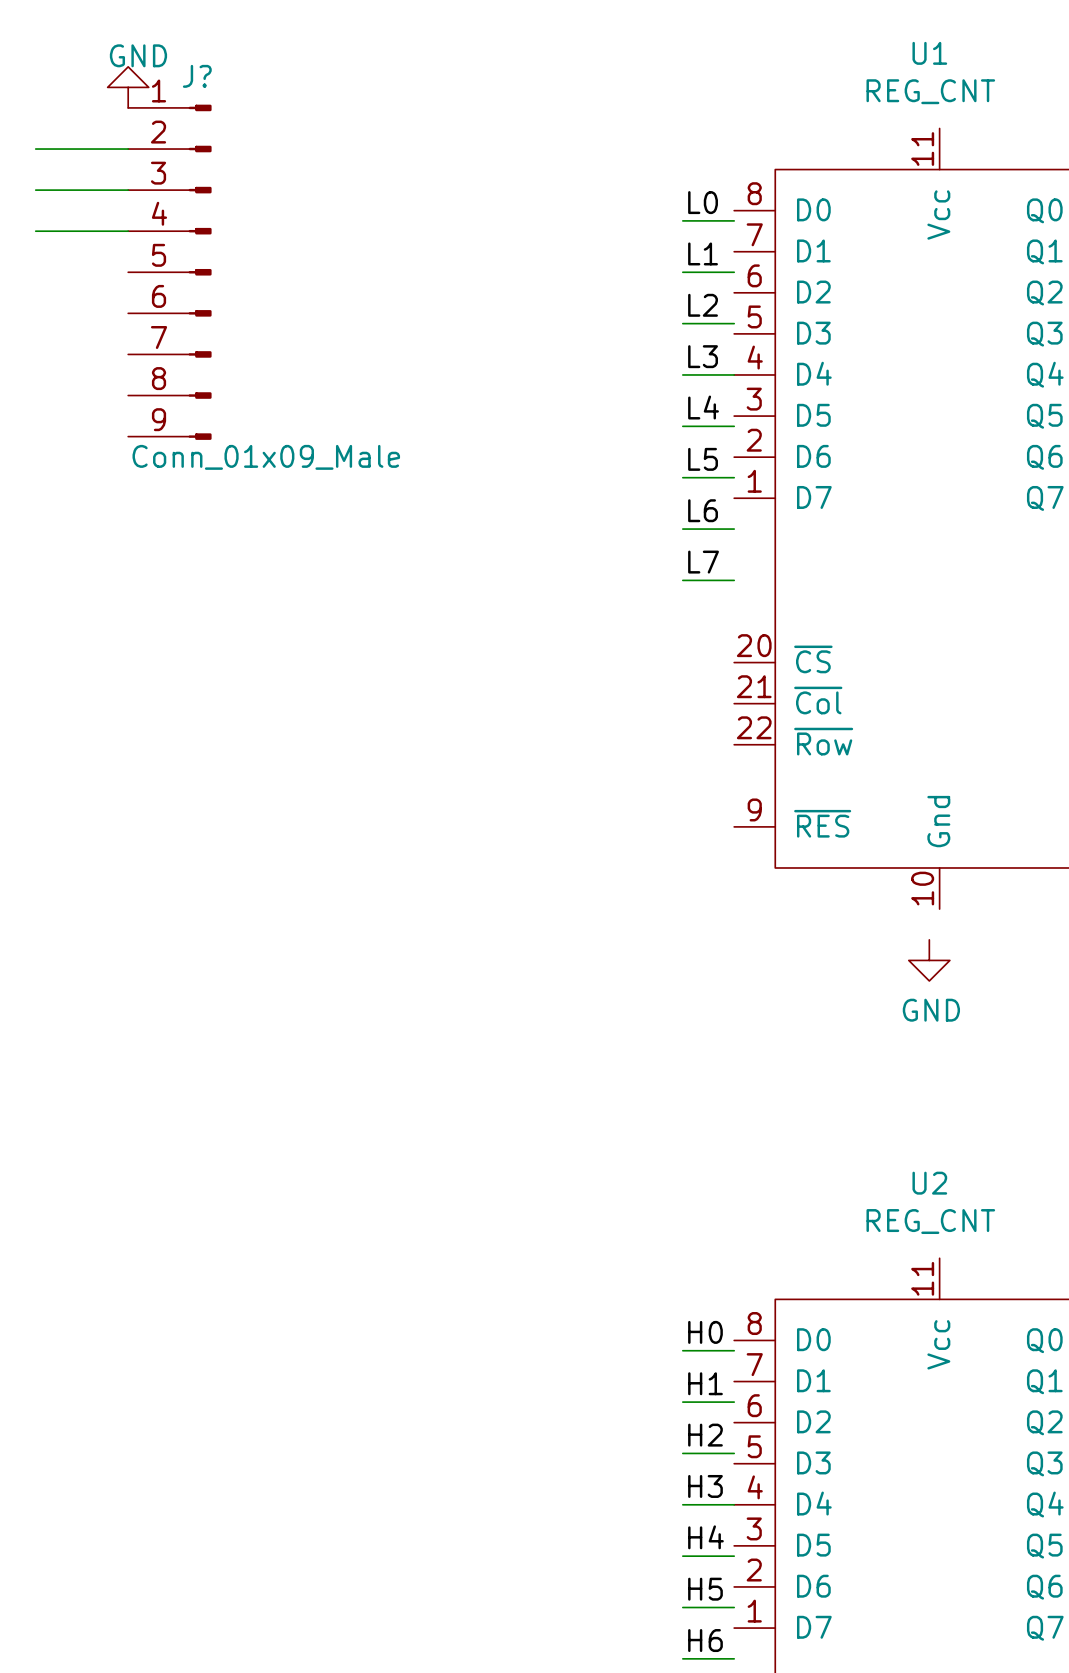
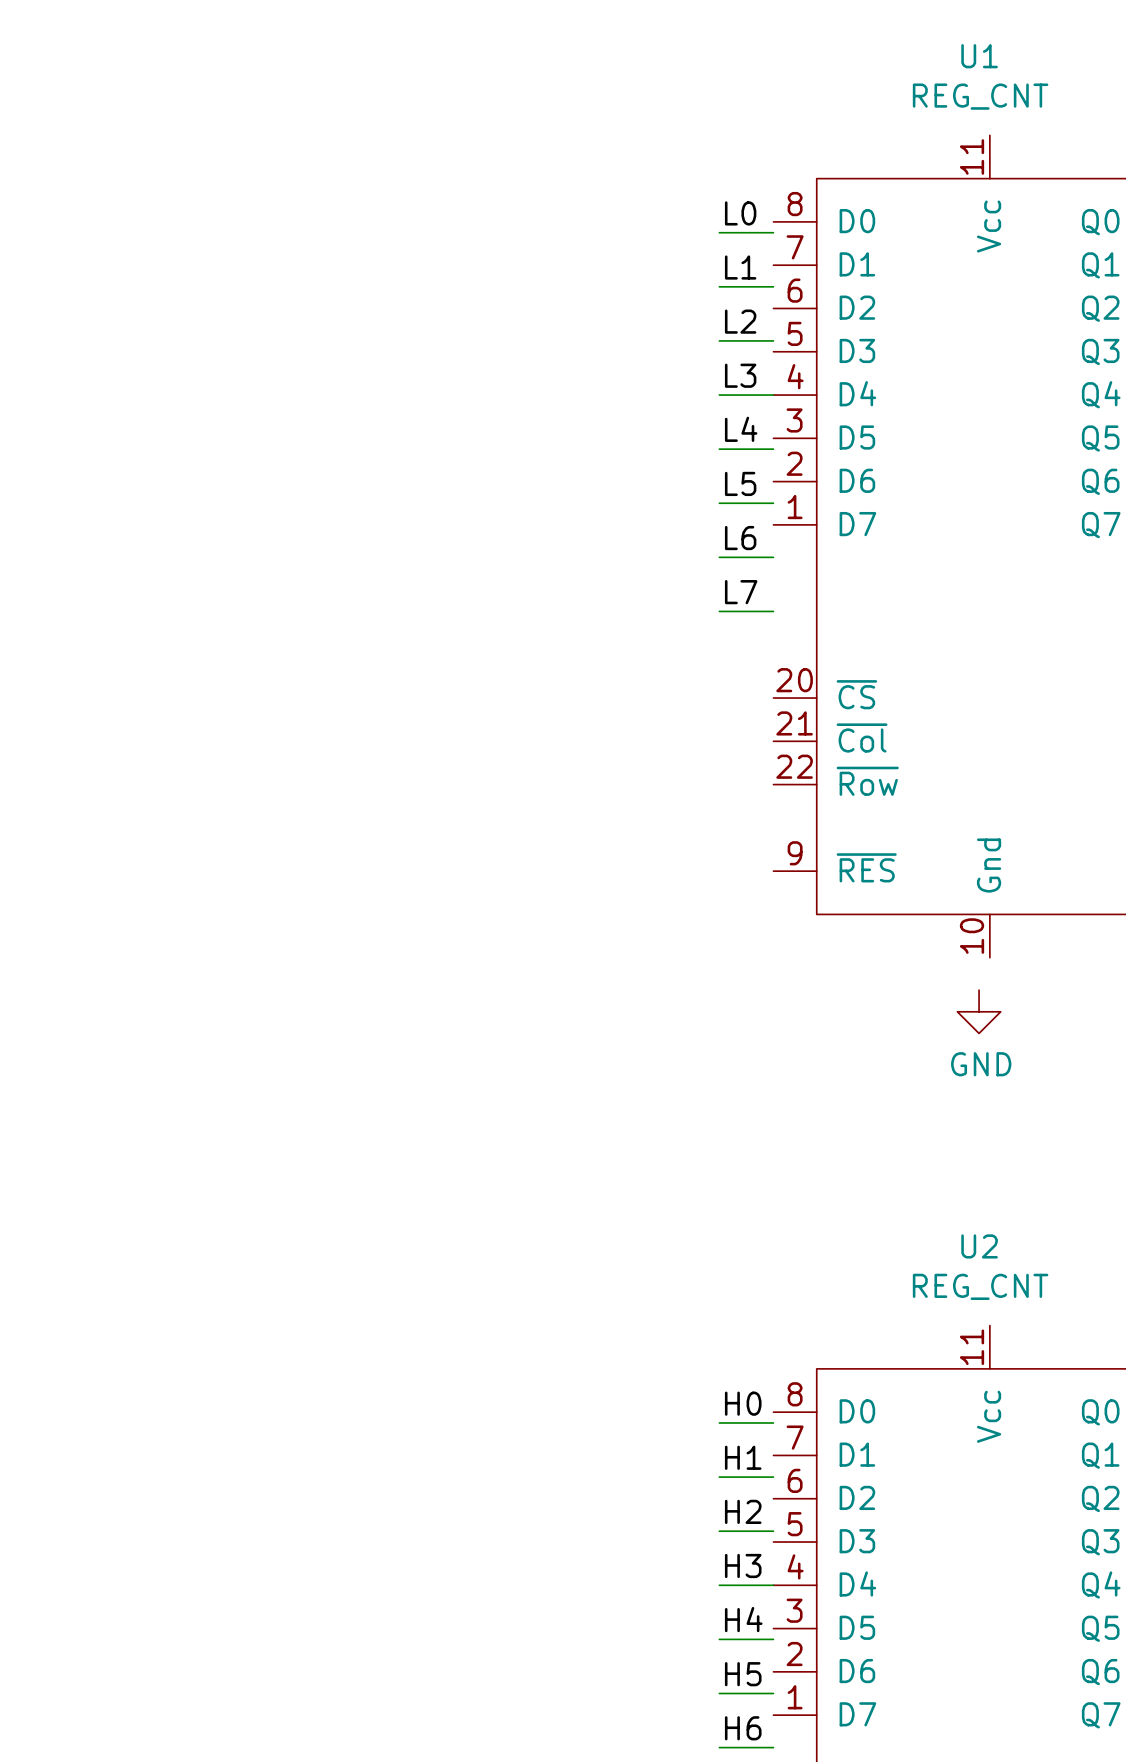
power symbol: GND (128, 87) -> none
wire: (35, 149) (128, 149) -> none
wire: (35, 190) (128, 190) -> none
wire: (35, 231) (128, 231) -> none
J?: Conn_01x09_Male (169, 272) -> none

